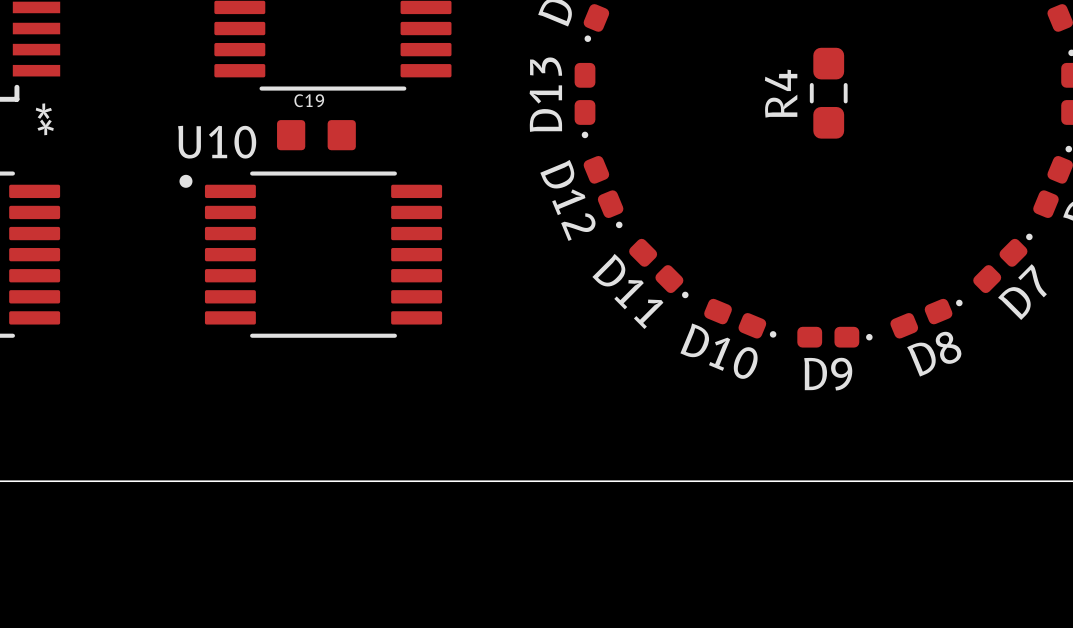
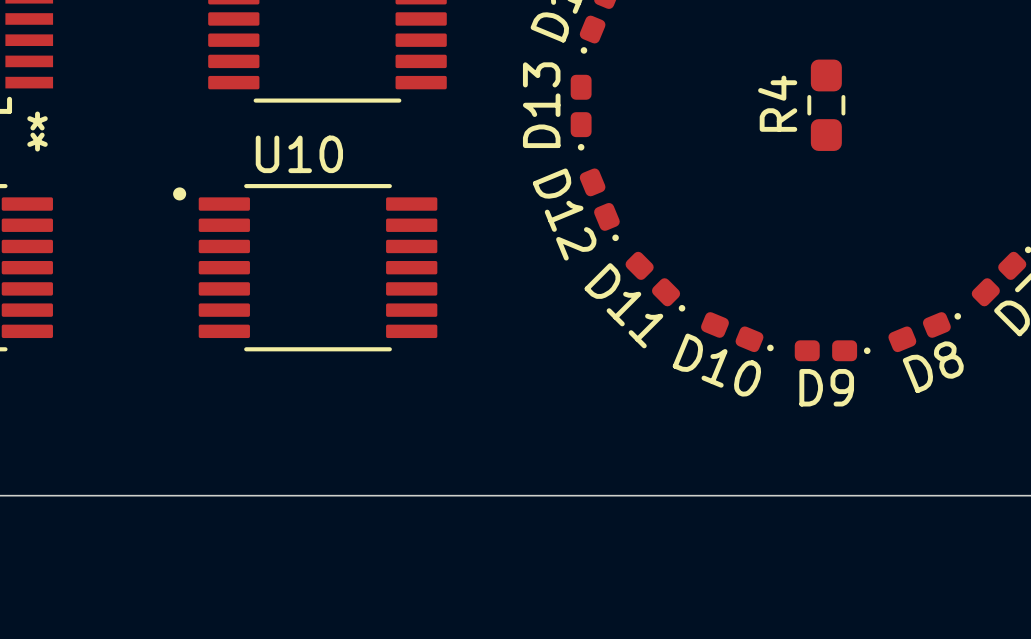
C19: (316, 135) -> none
U10 name position: U10 (217, 142) -> U10 (299, 154)

